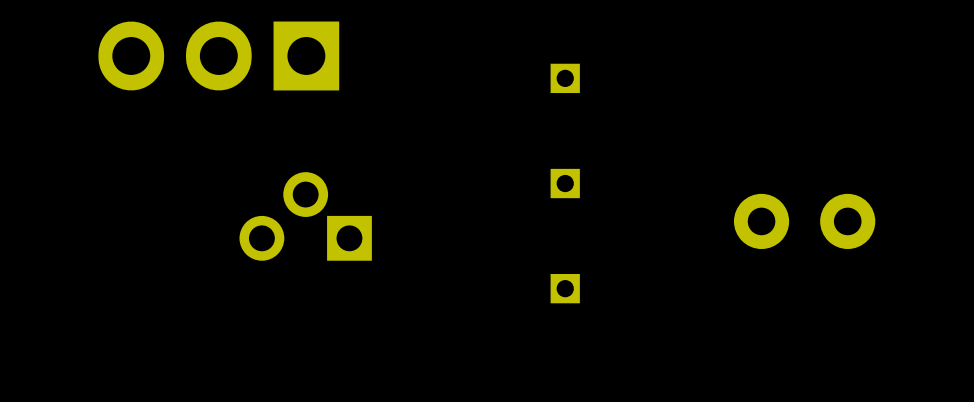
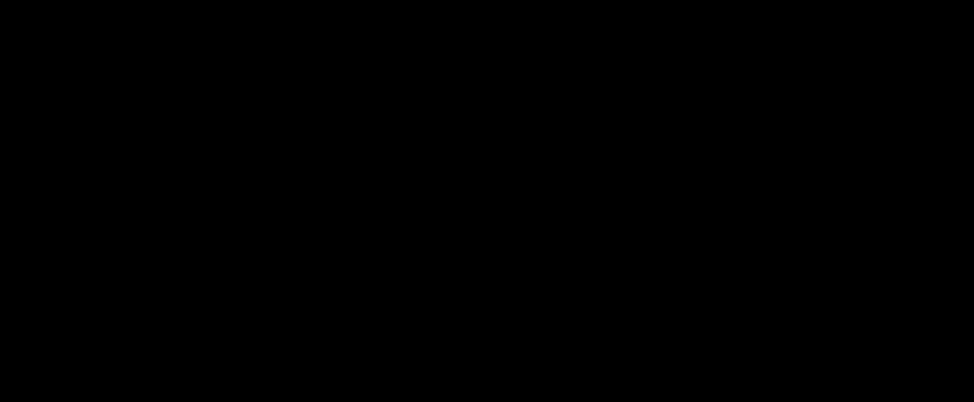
part: (218, 55) -> none
part: (565, 78) -> none
part: (565, 183) -> none
part: (305, 216) -> none
part: (804, 221) -> none
part: (565, 288) -> none

